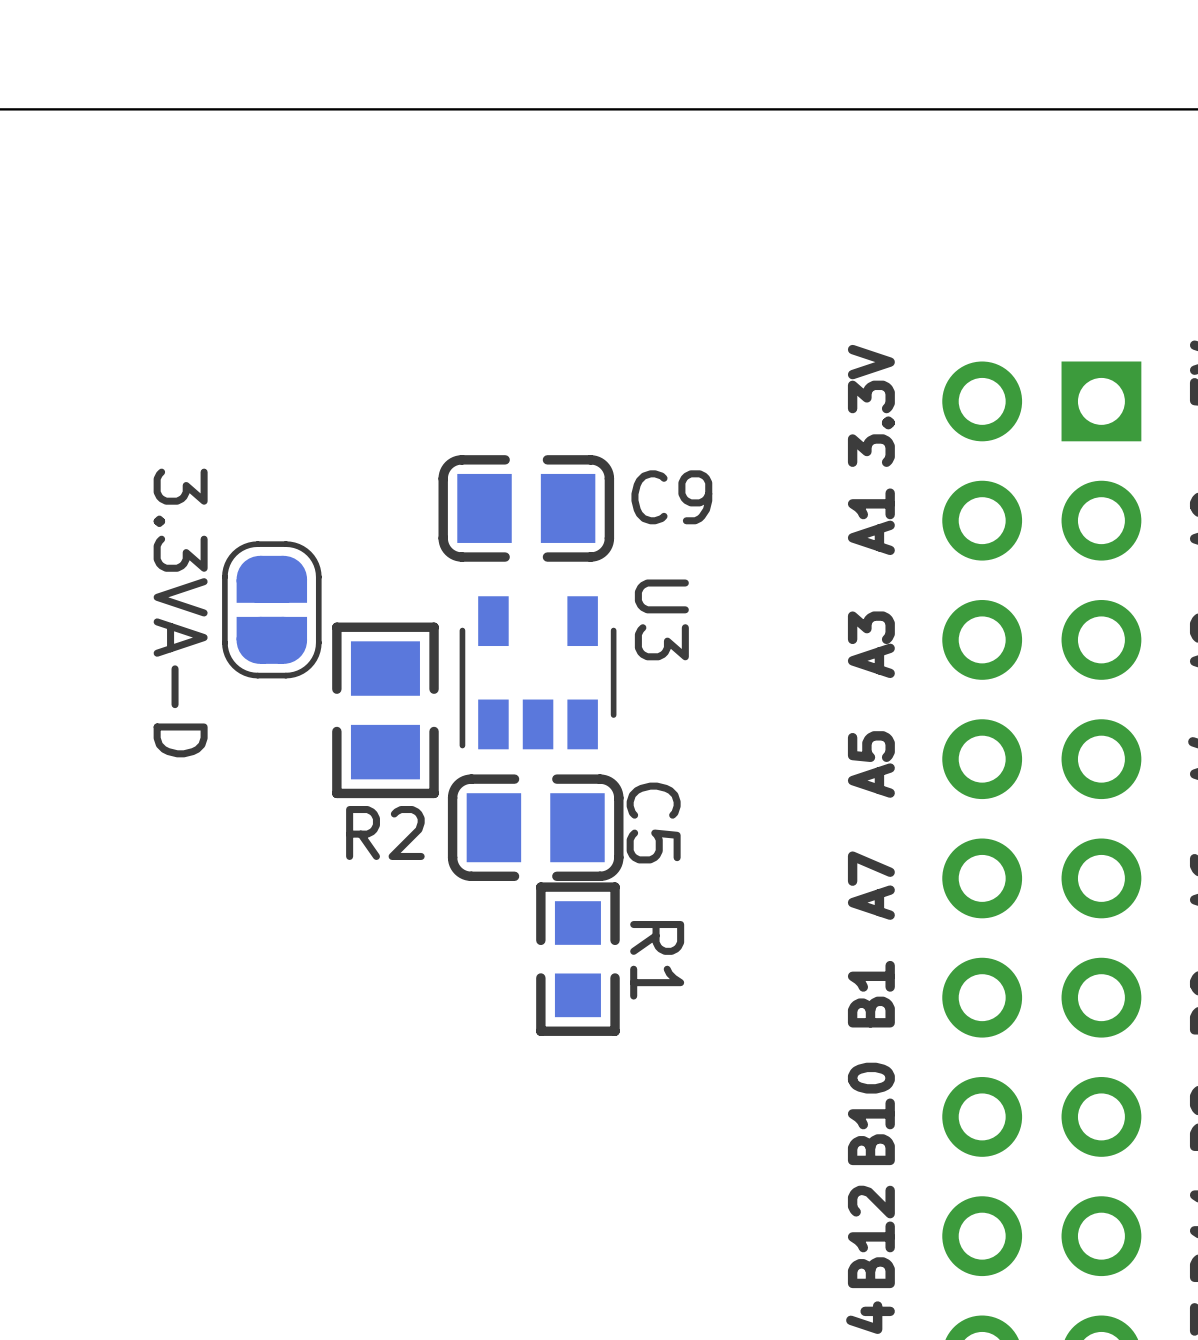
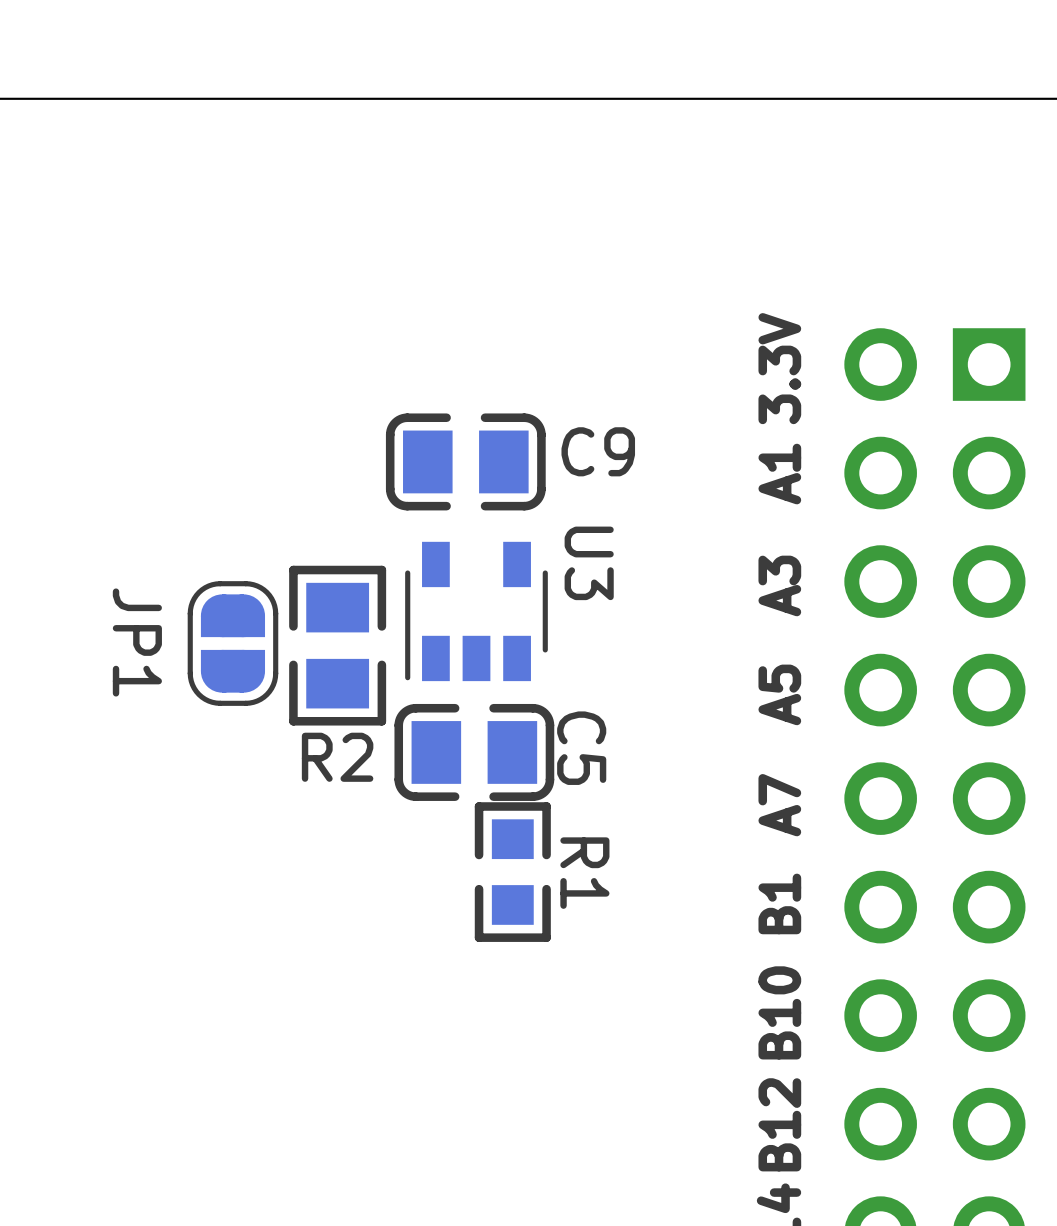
part: (271, 609) -> none
text: 3.3VA-D (180, 612) -> none
JP1: none -> (232, 643)

